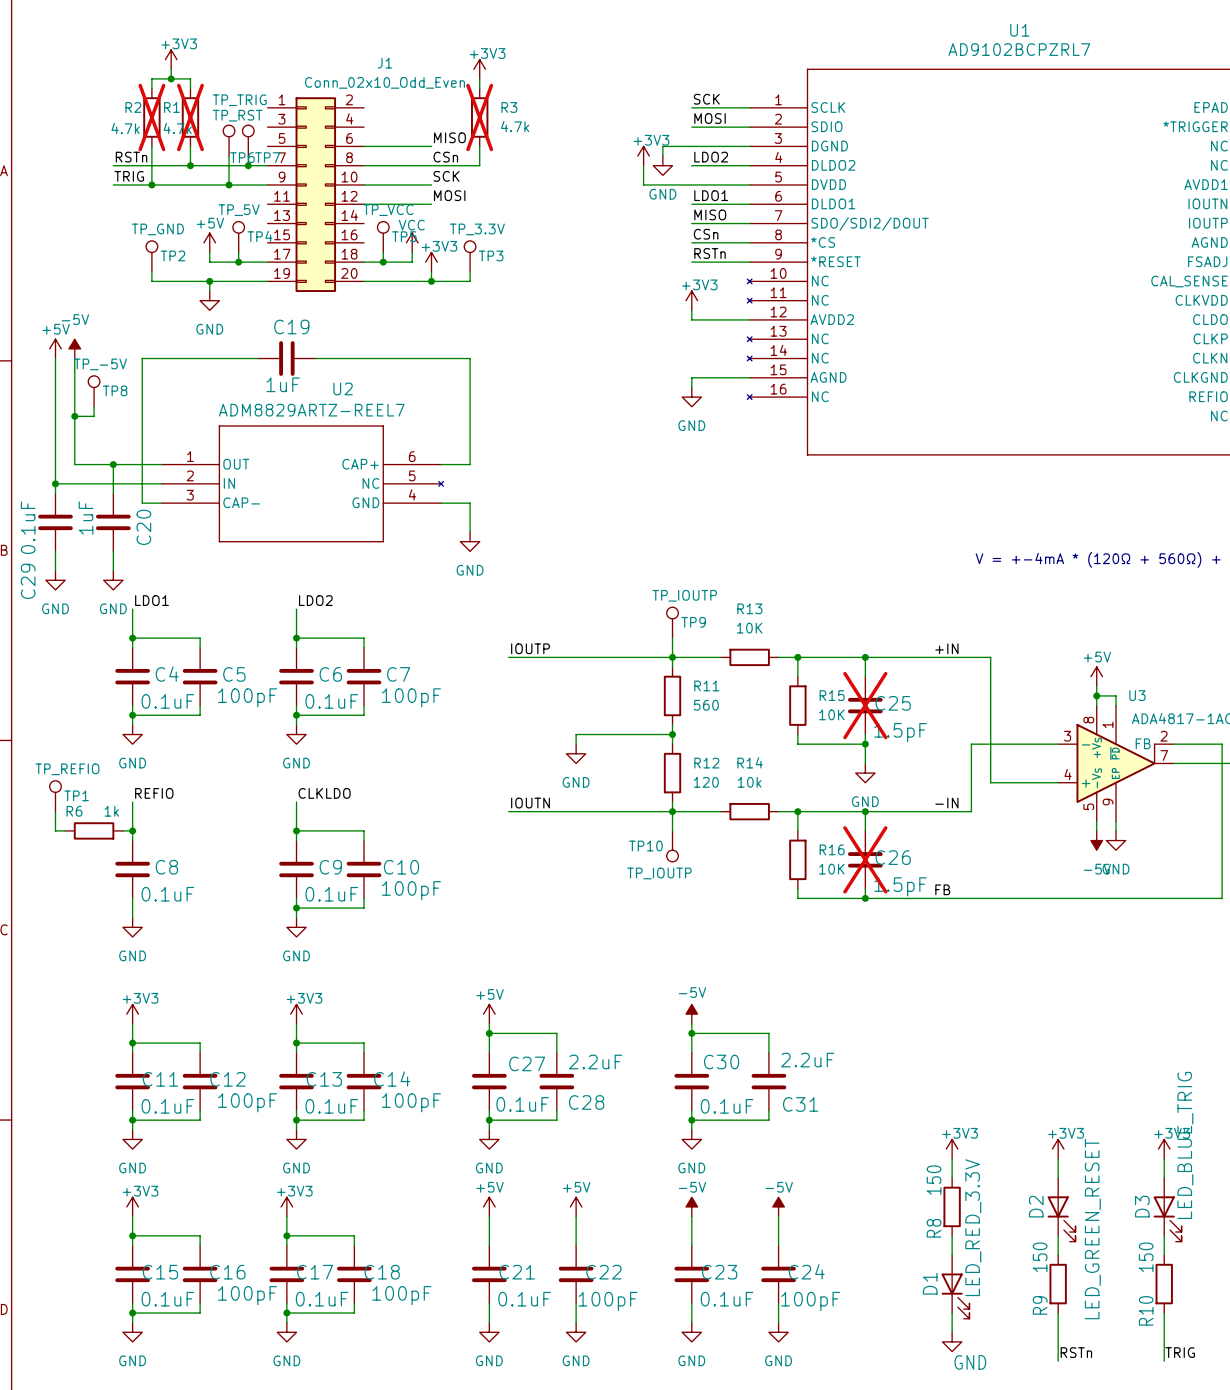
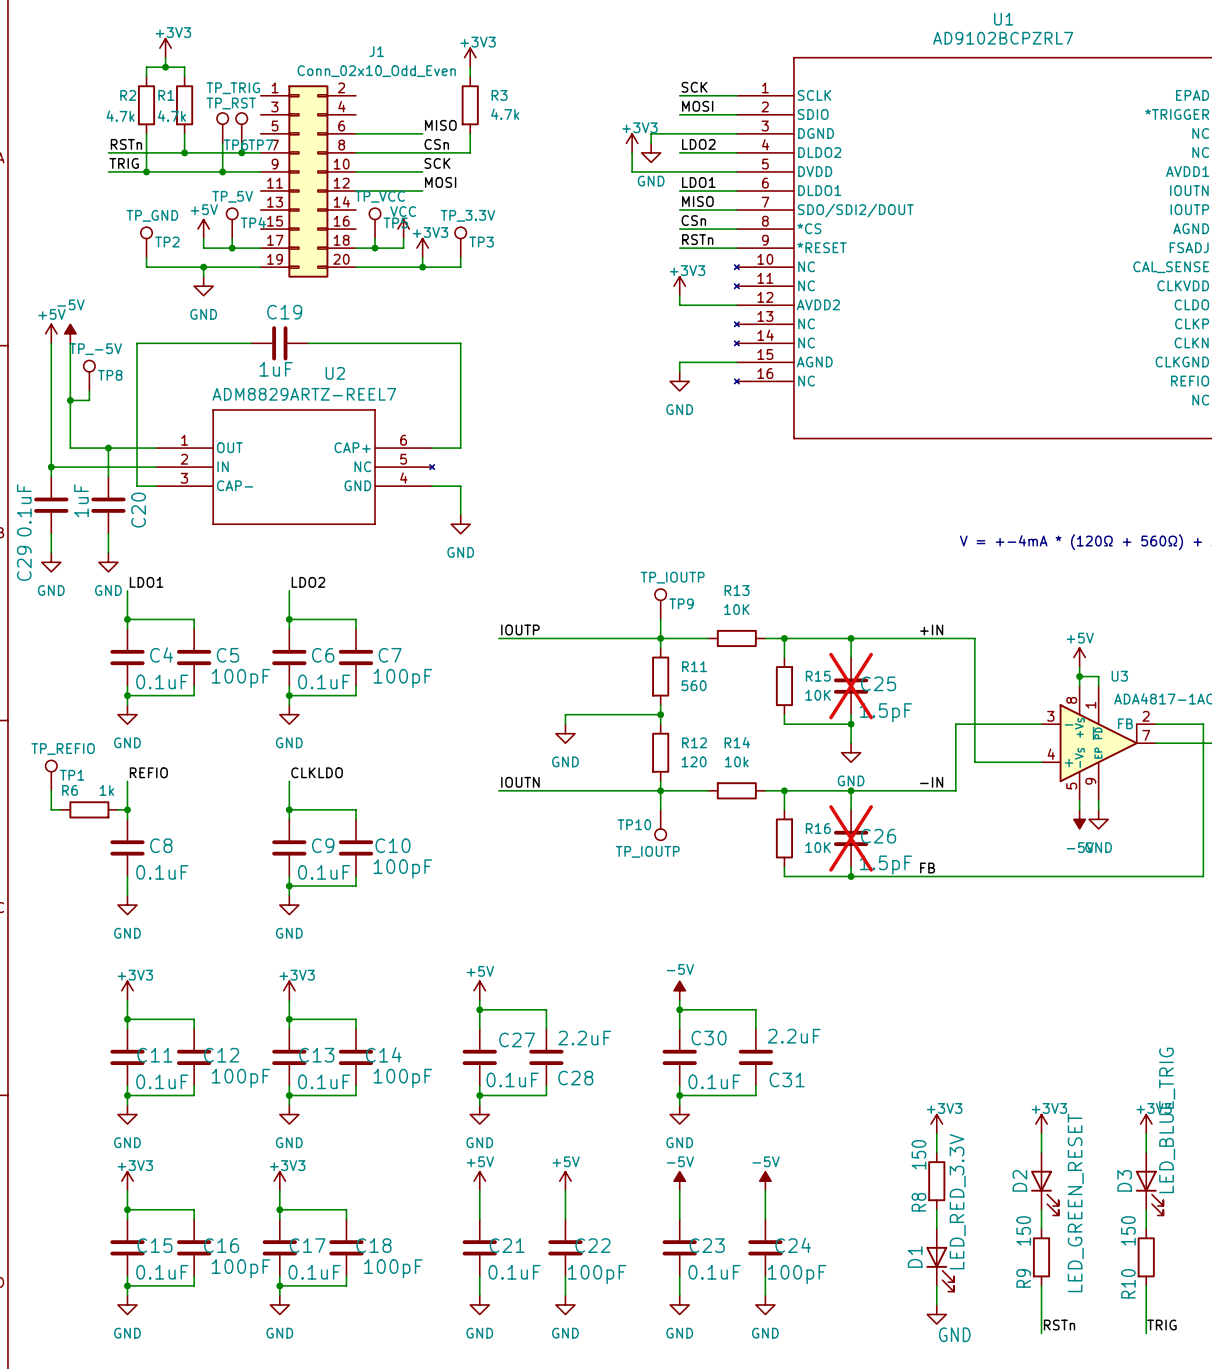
R2 do-not-place cross: (151, 117) -> none
R1 do-not-place cross: (190, 117) -> none
R3 do-not-place cross: (479, 117) -> none

